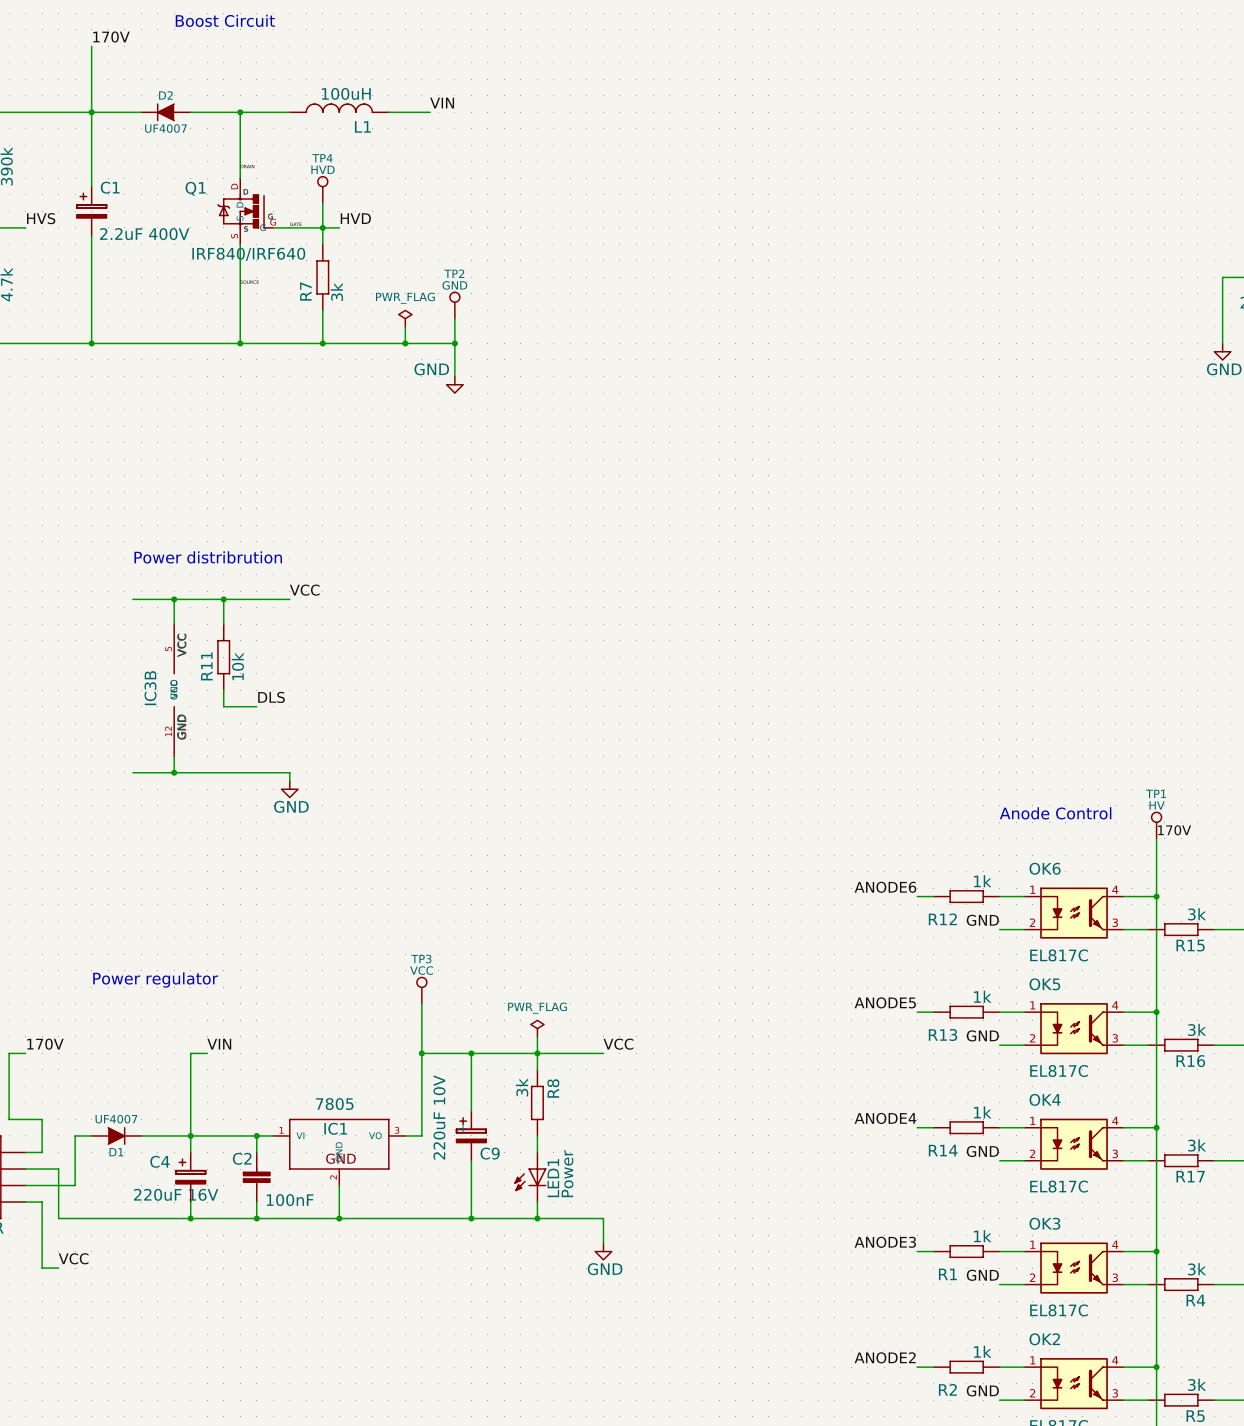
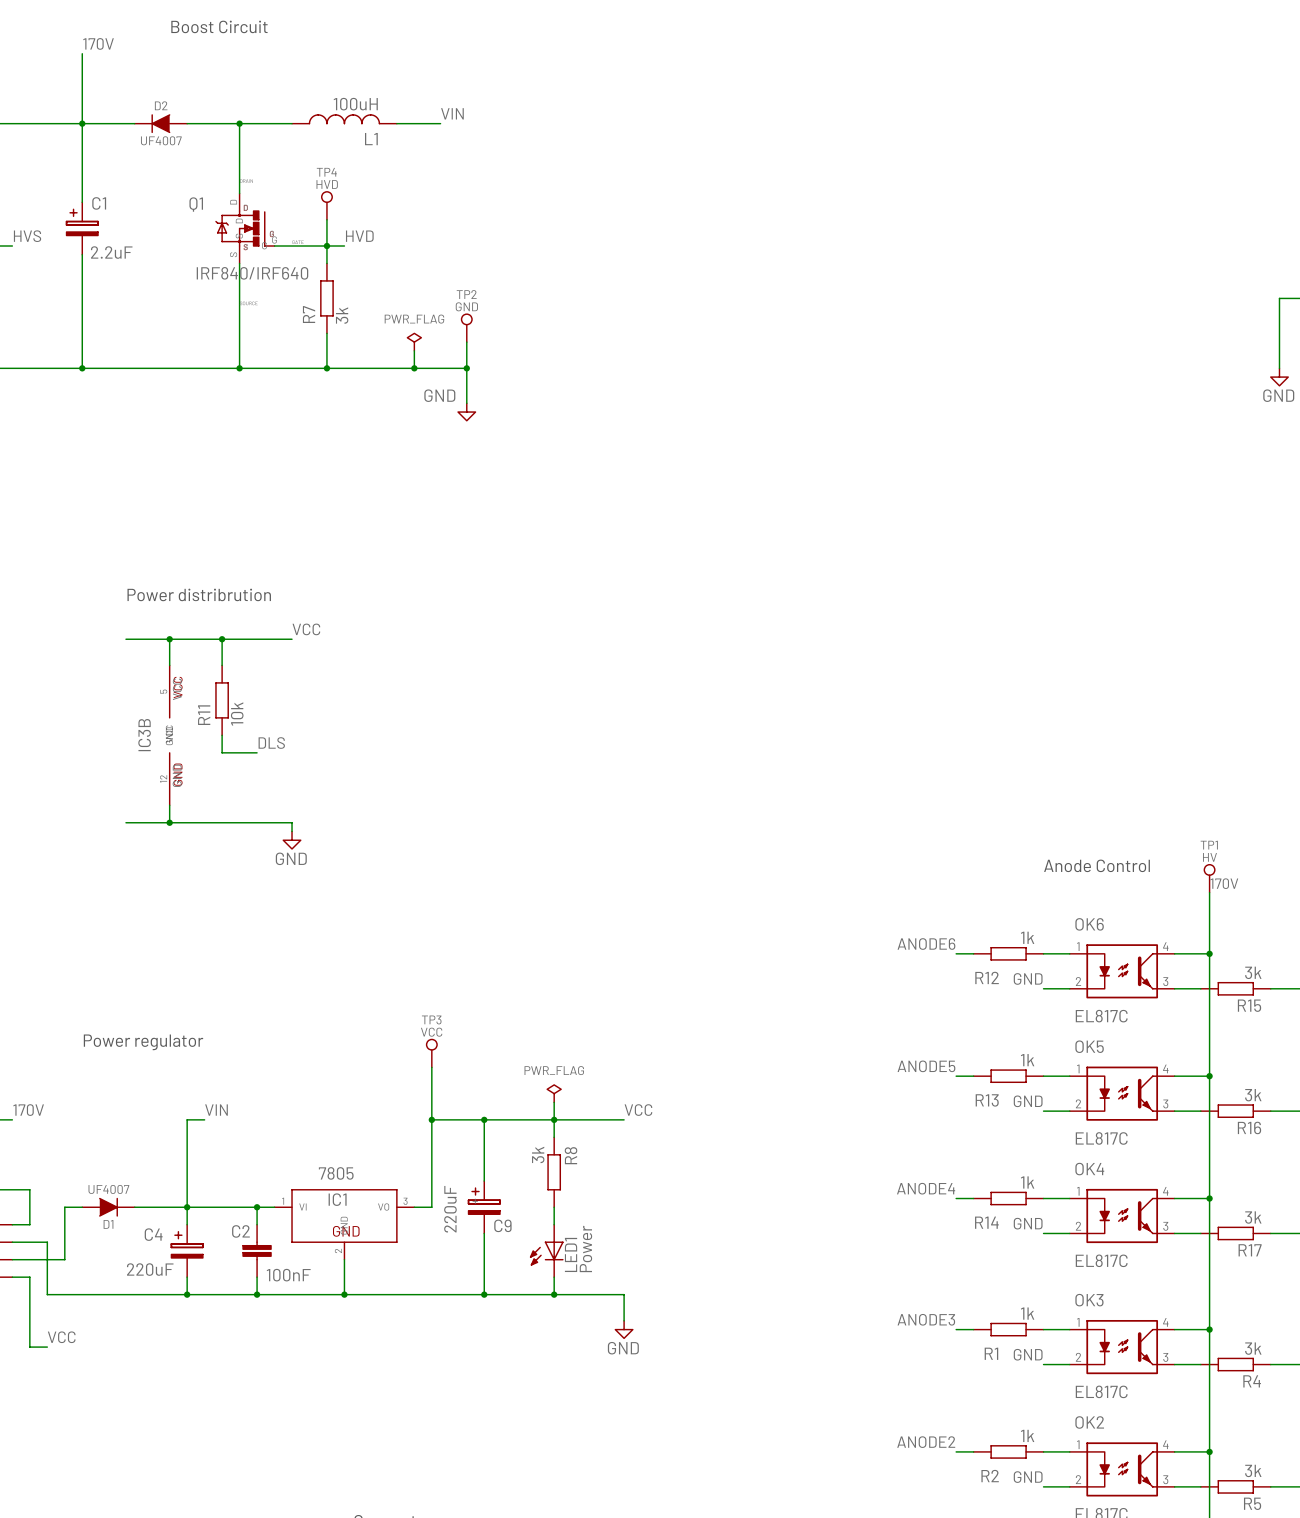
C1 value: 2.2uF 400V (144, 234) -> 2.2uF (111, 252)
C9 value: 220uF 10V (439, 1117) -> 220uF (450, 1209)
C4 value: 220uF 16V (176, 1194) -> 220uF (150, 1269)

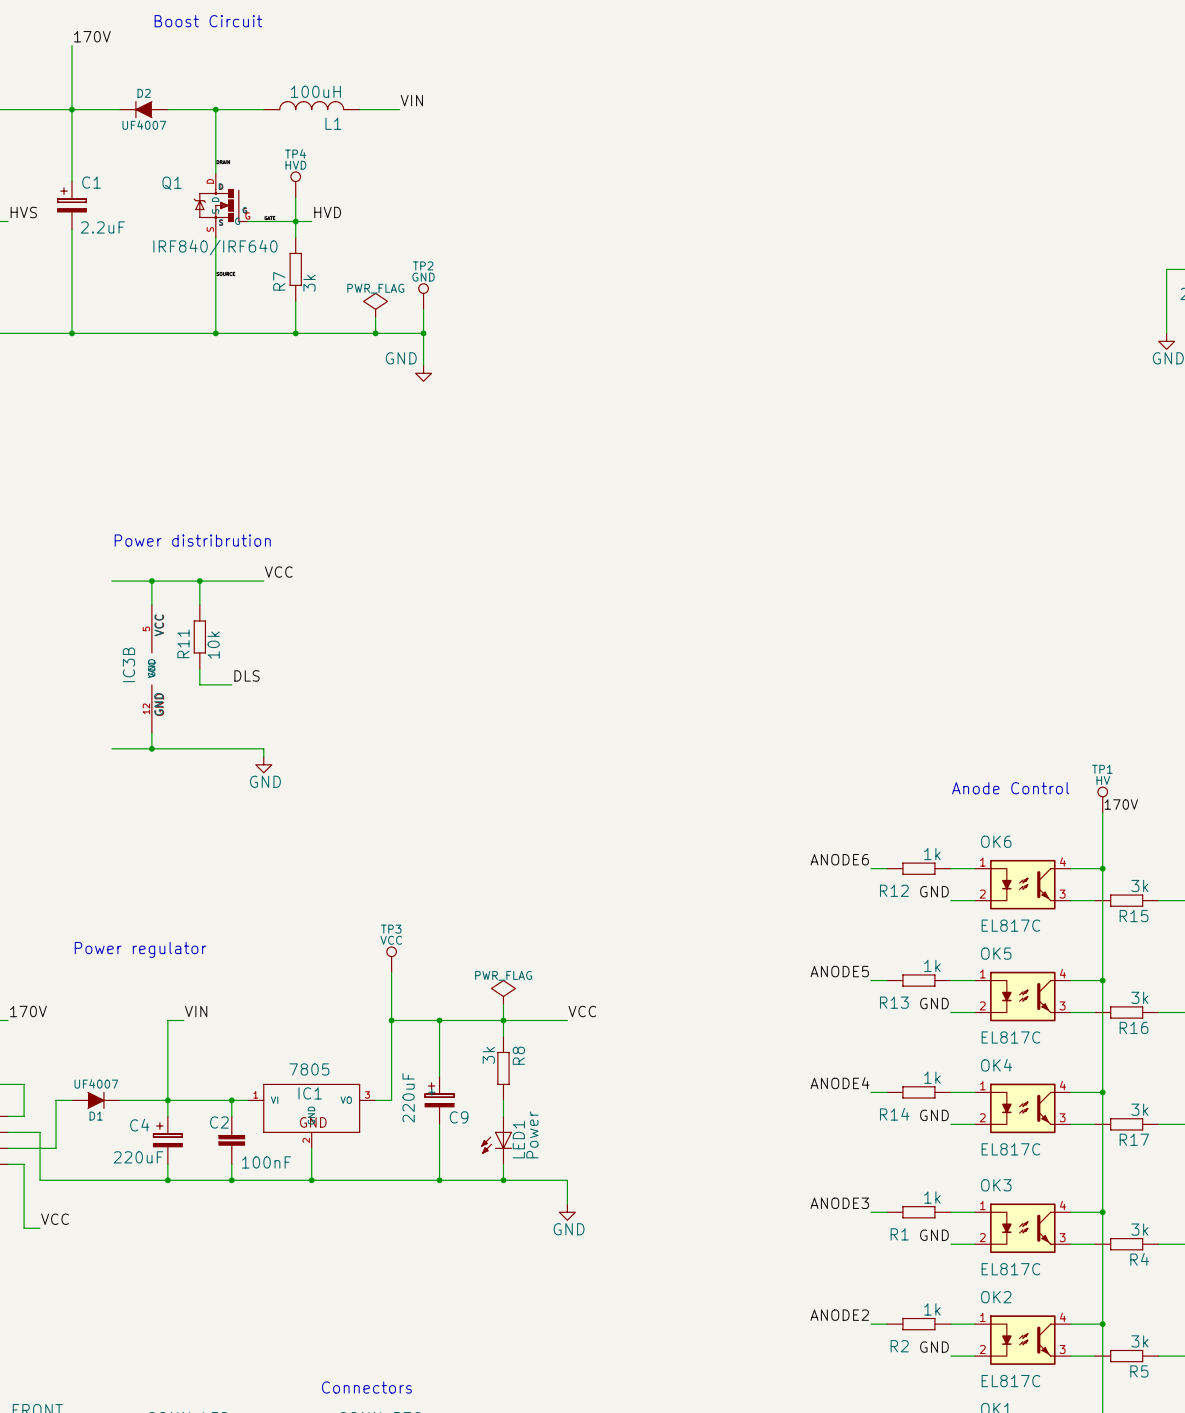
power symbol shape: [407, 333, 422, 351] -> [363, 293, 388, 318]
power symbol shape: [547, 1084, 562, 1103] -> [491, 980, 516, 1005]

